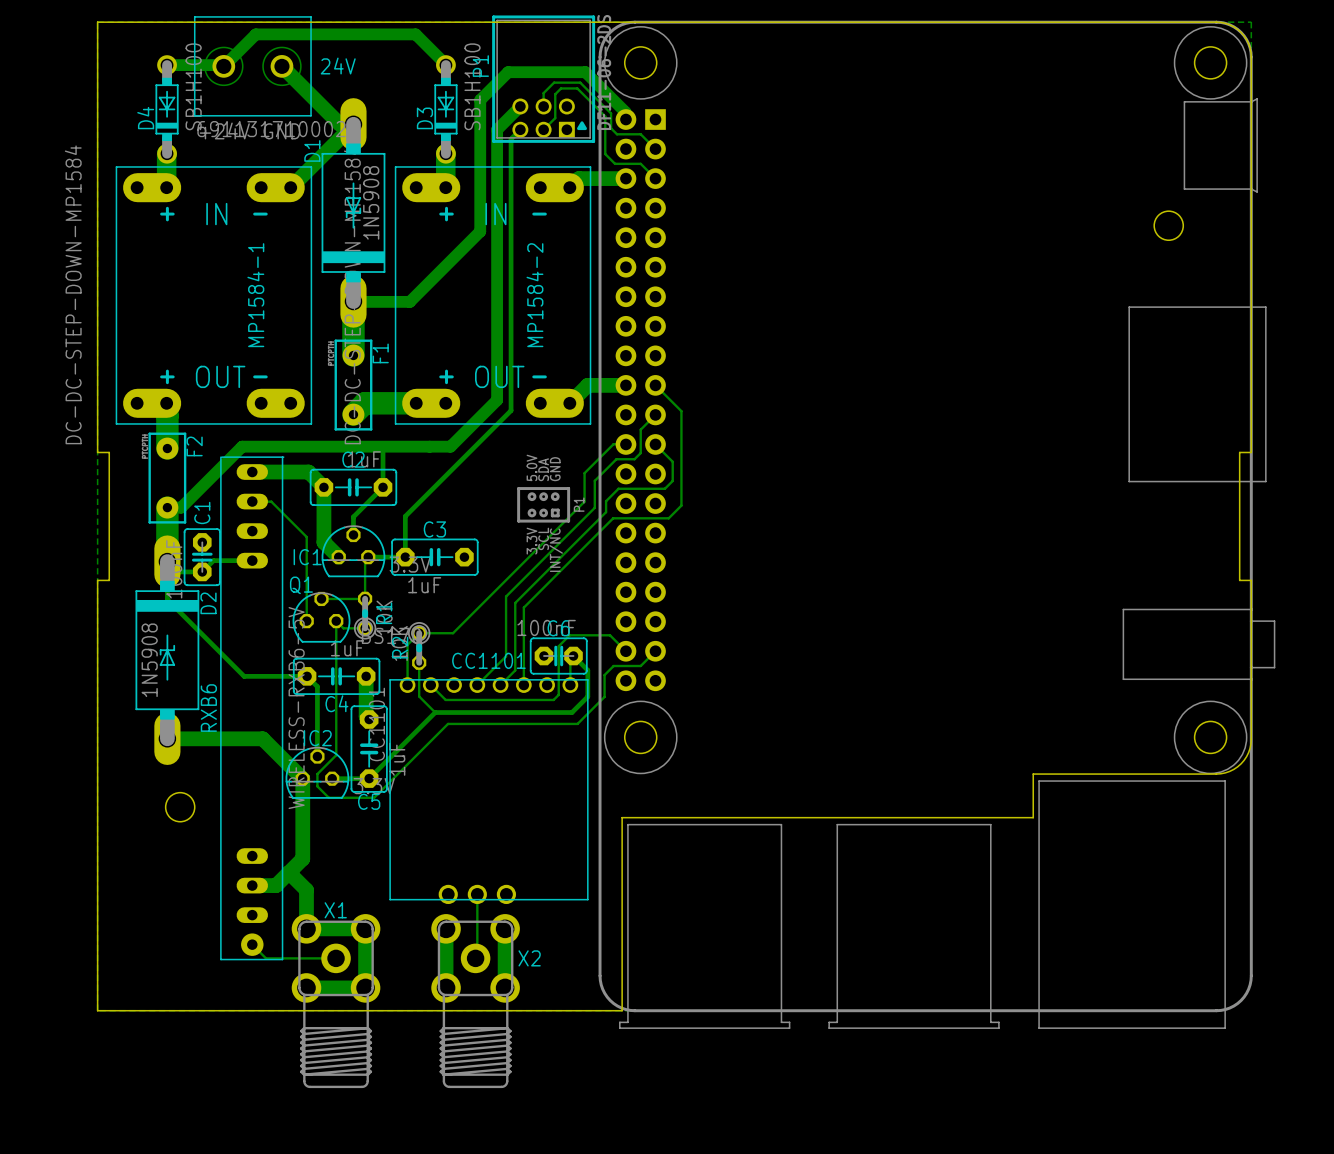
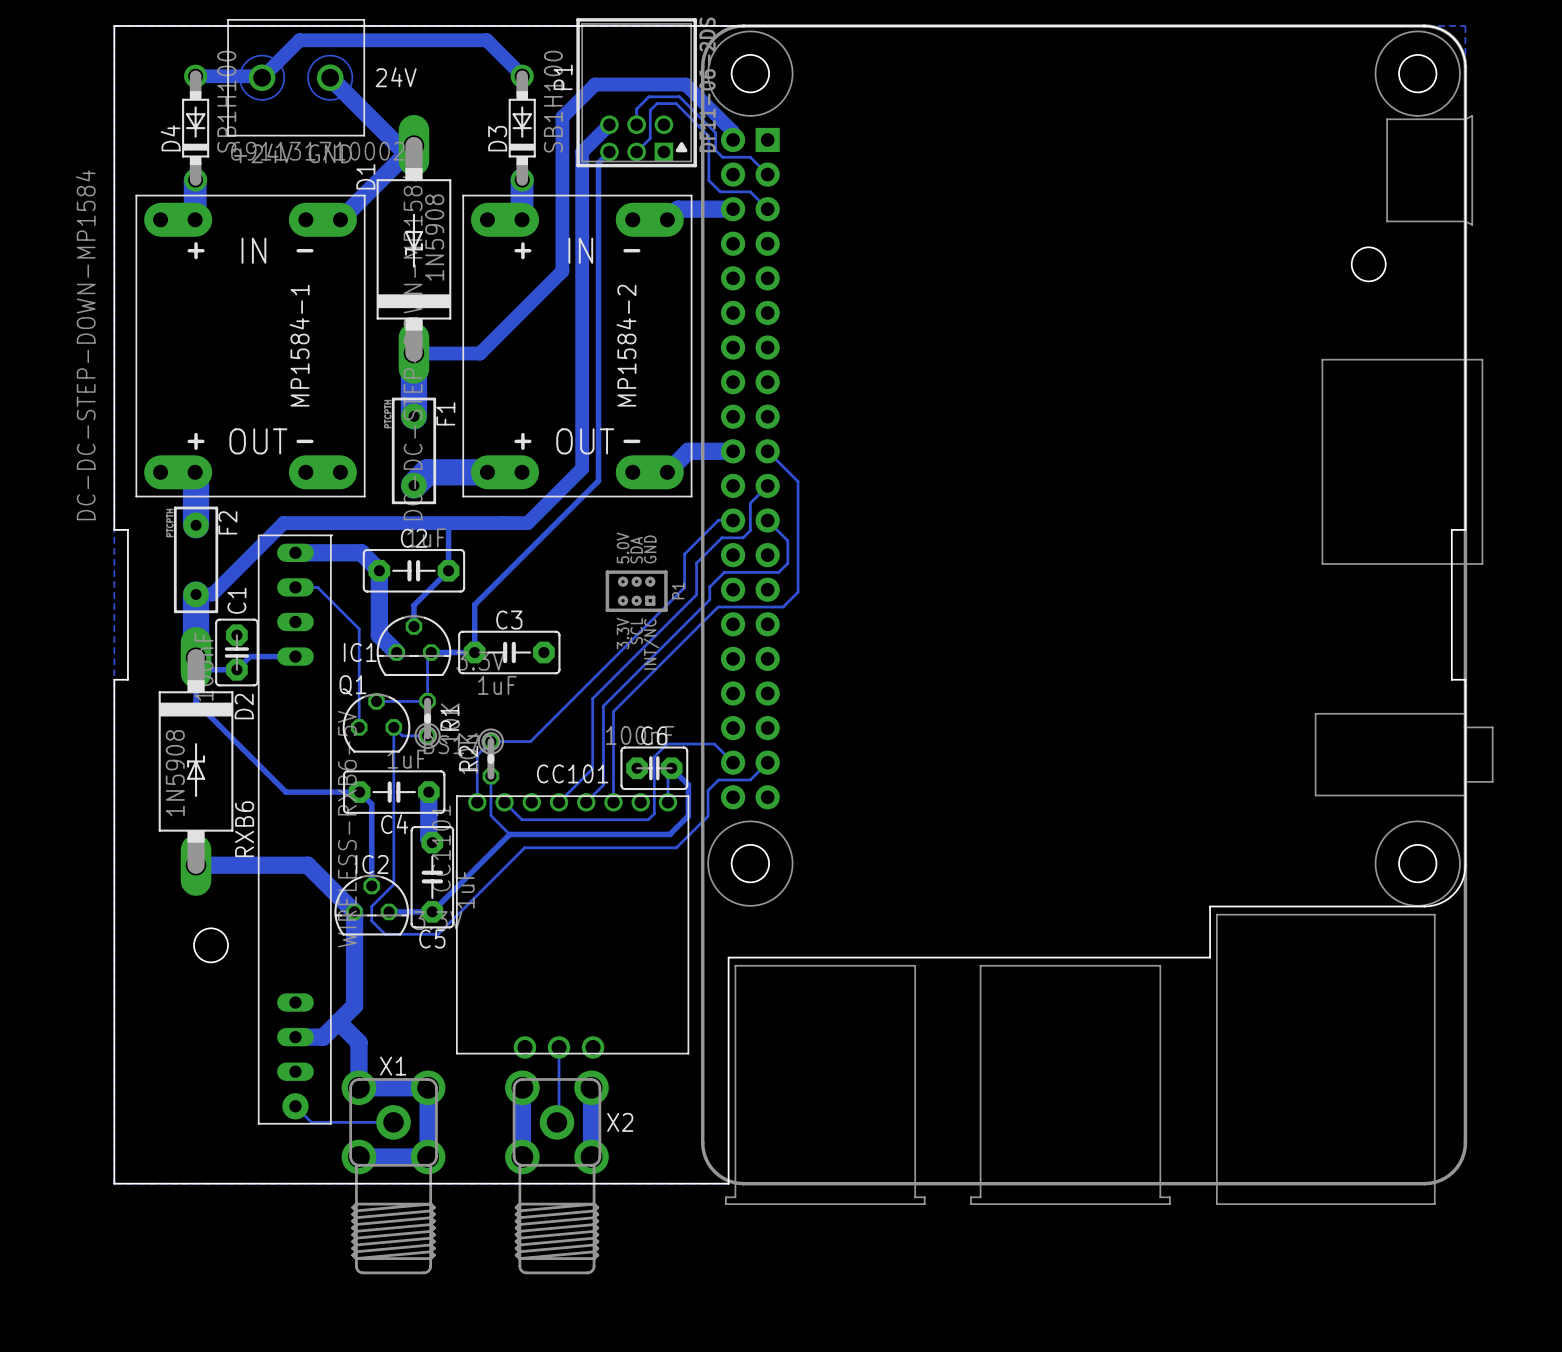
CC1101 name: CC1101 (488, 660) -> CC101 (572, 773)

